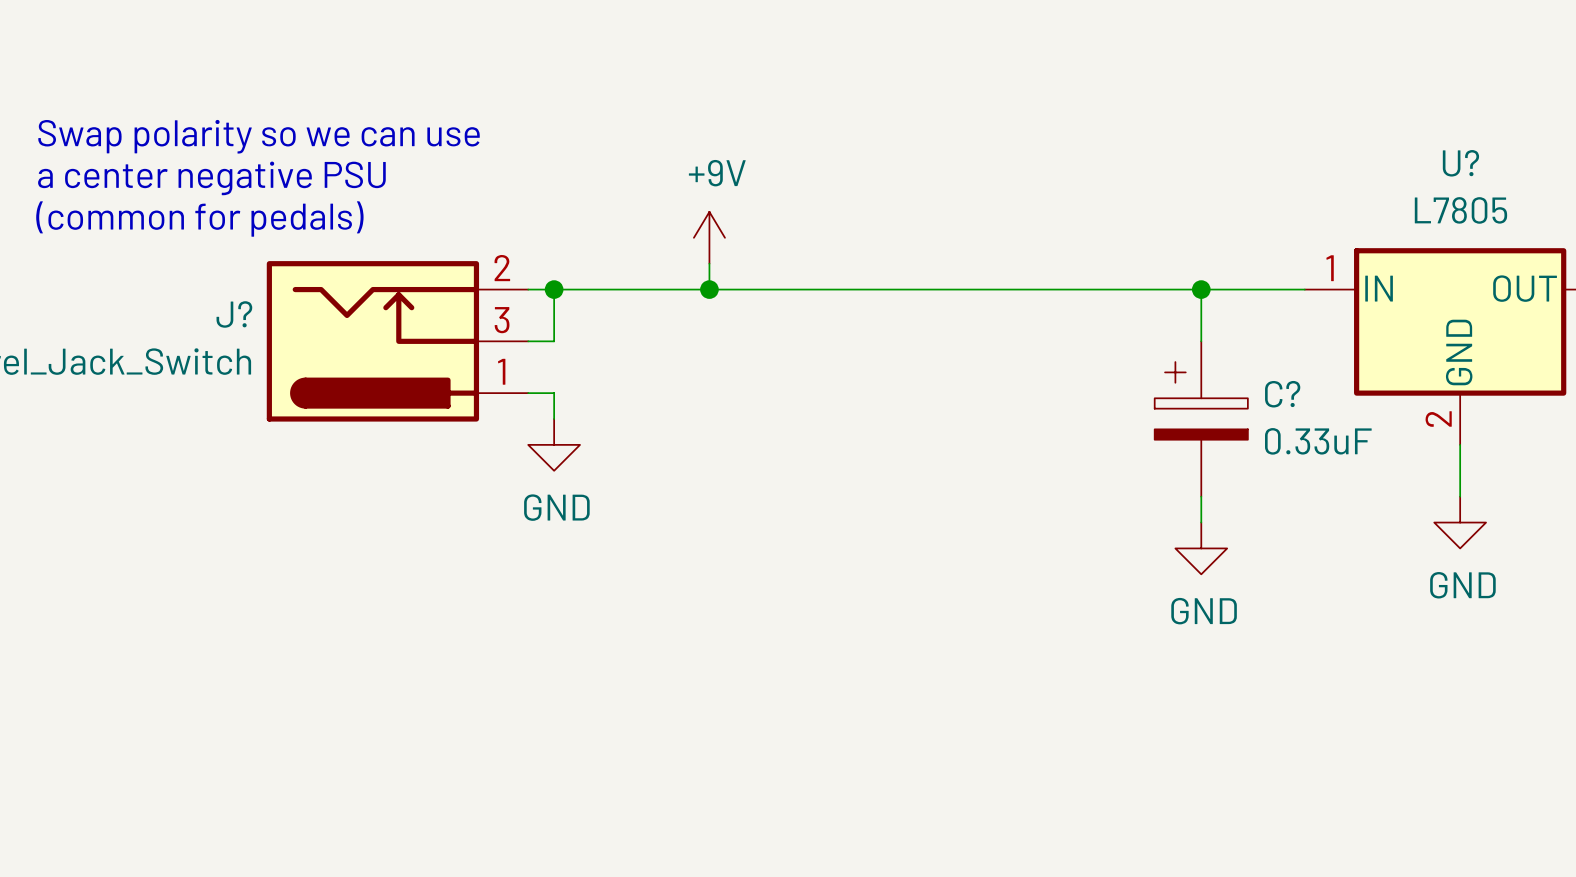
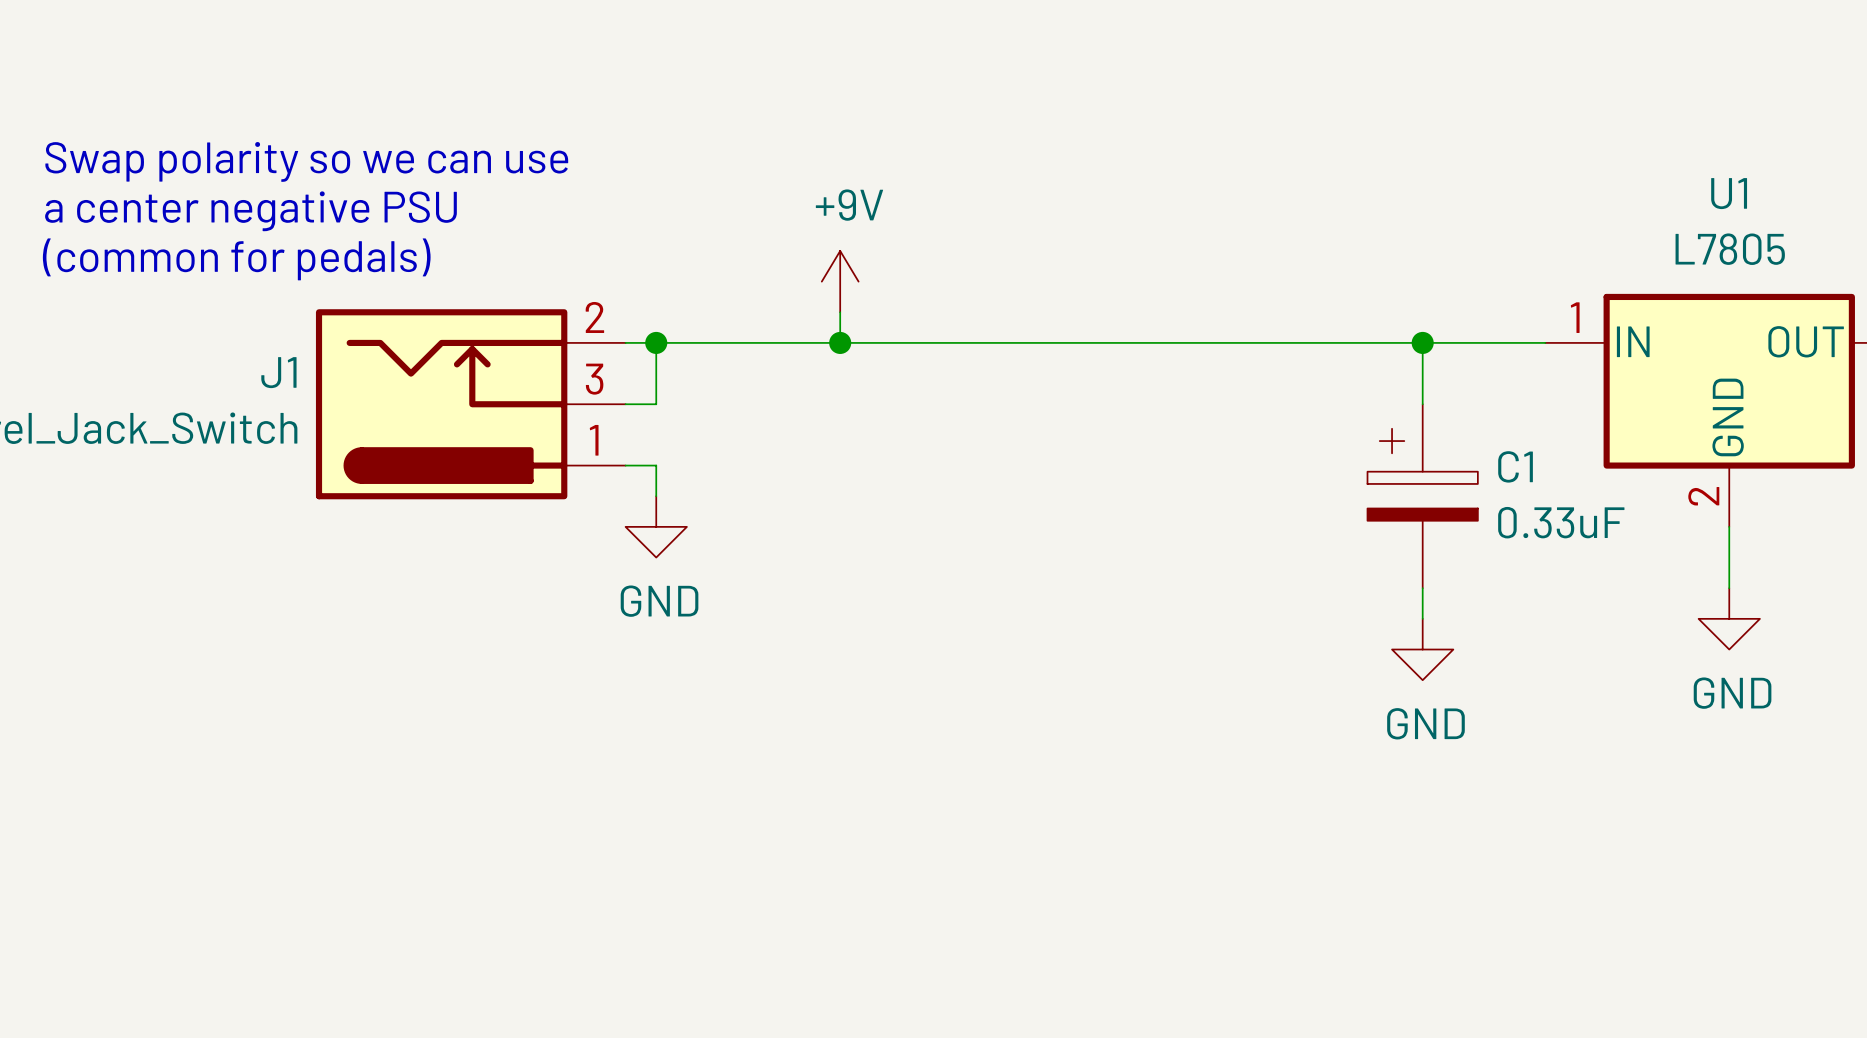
U? name: U? (1460, 163) -> U1 (1729, 193)
J? name: J? (234, 314) -> J1 (278, 372)
C? name: C? (1282, 394) -> C1 (1515, 466)

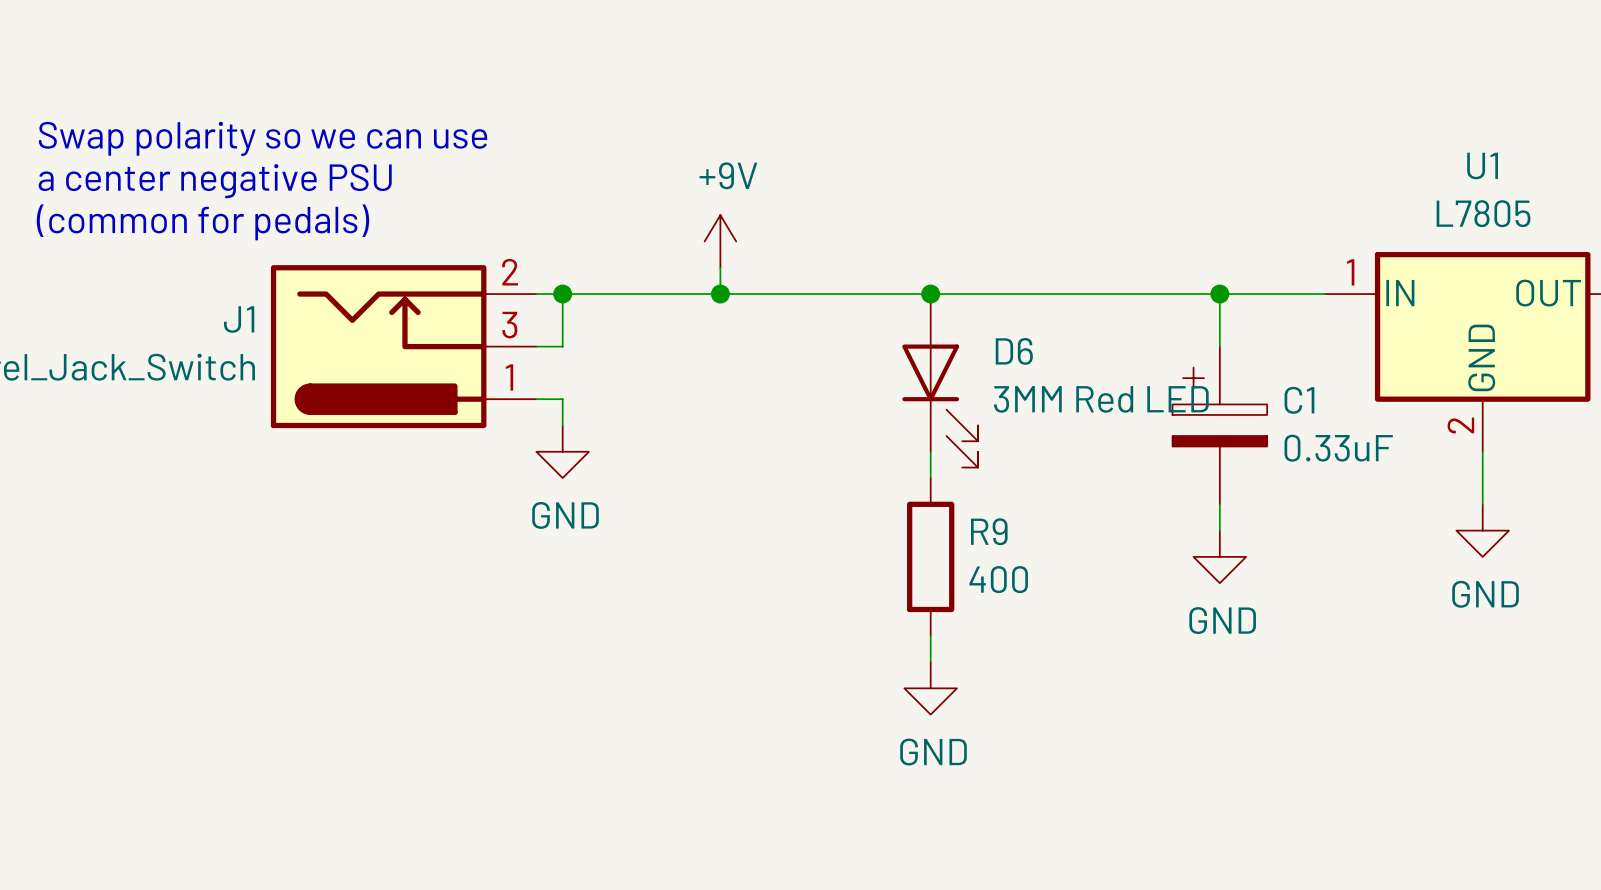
junction: none -> (930, 294)
D6: none -> 3MM Red LED (940, 380)
wire: none -> (930, 451) (930, 478)
R9: none -> 400 (930, 556)
wire: none -> (930, 635) (930, 662)
power symbol: none -> GND (930, 688)

